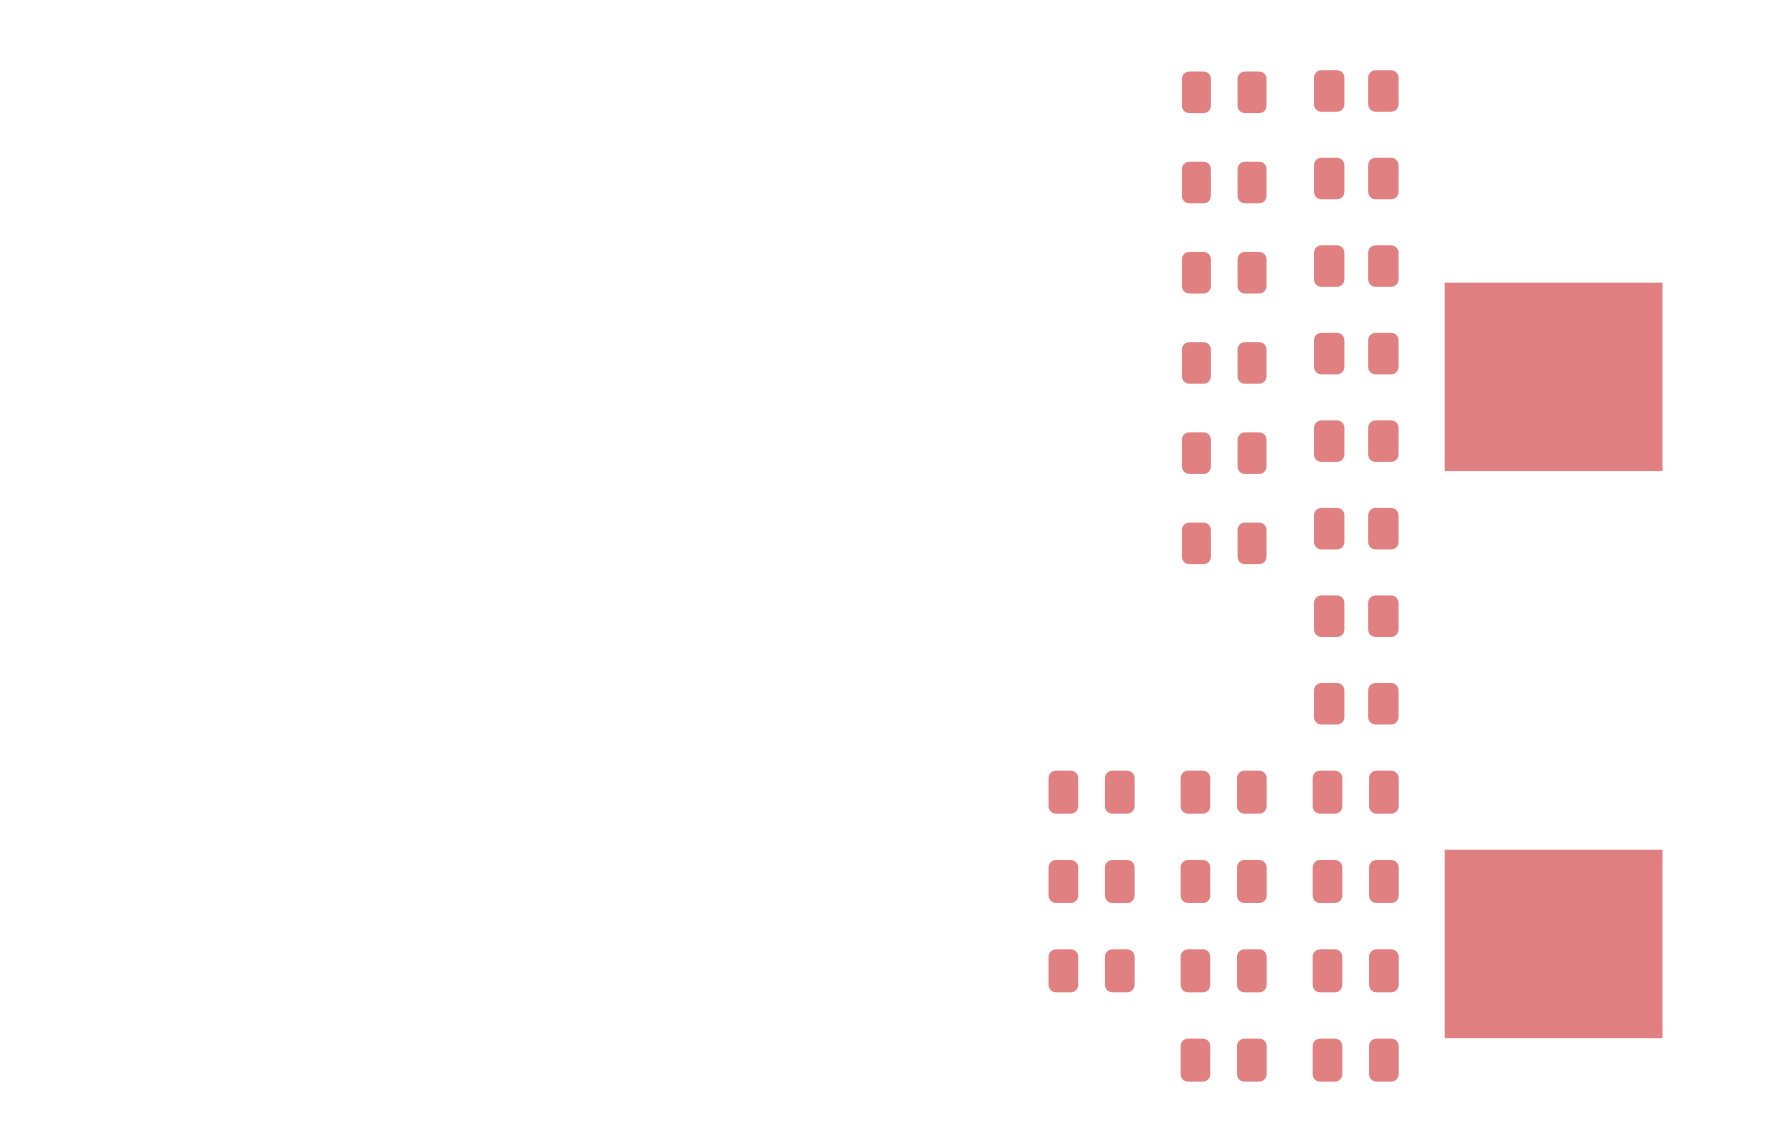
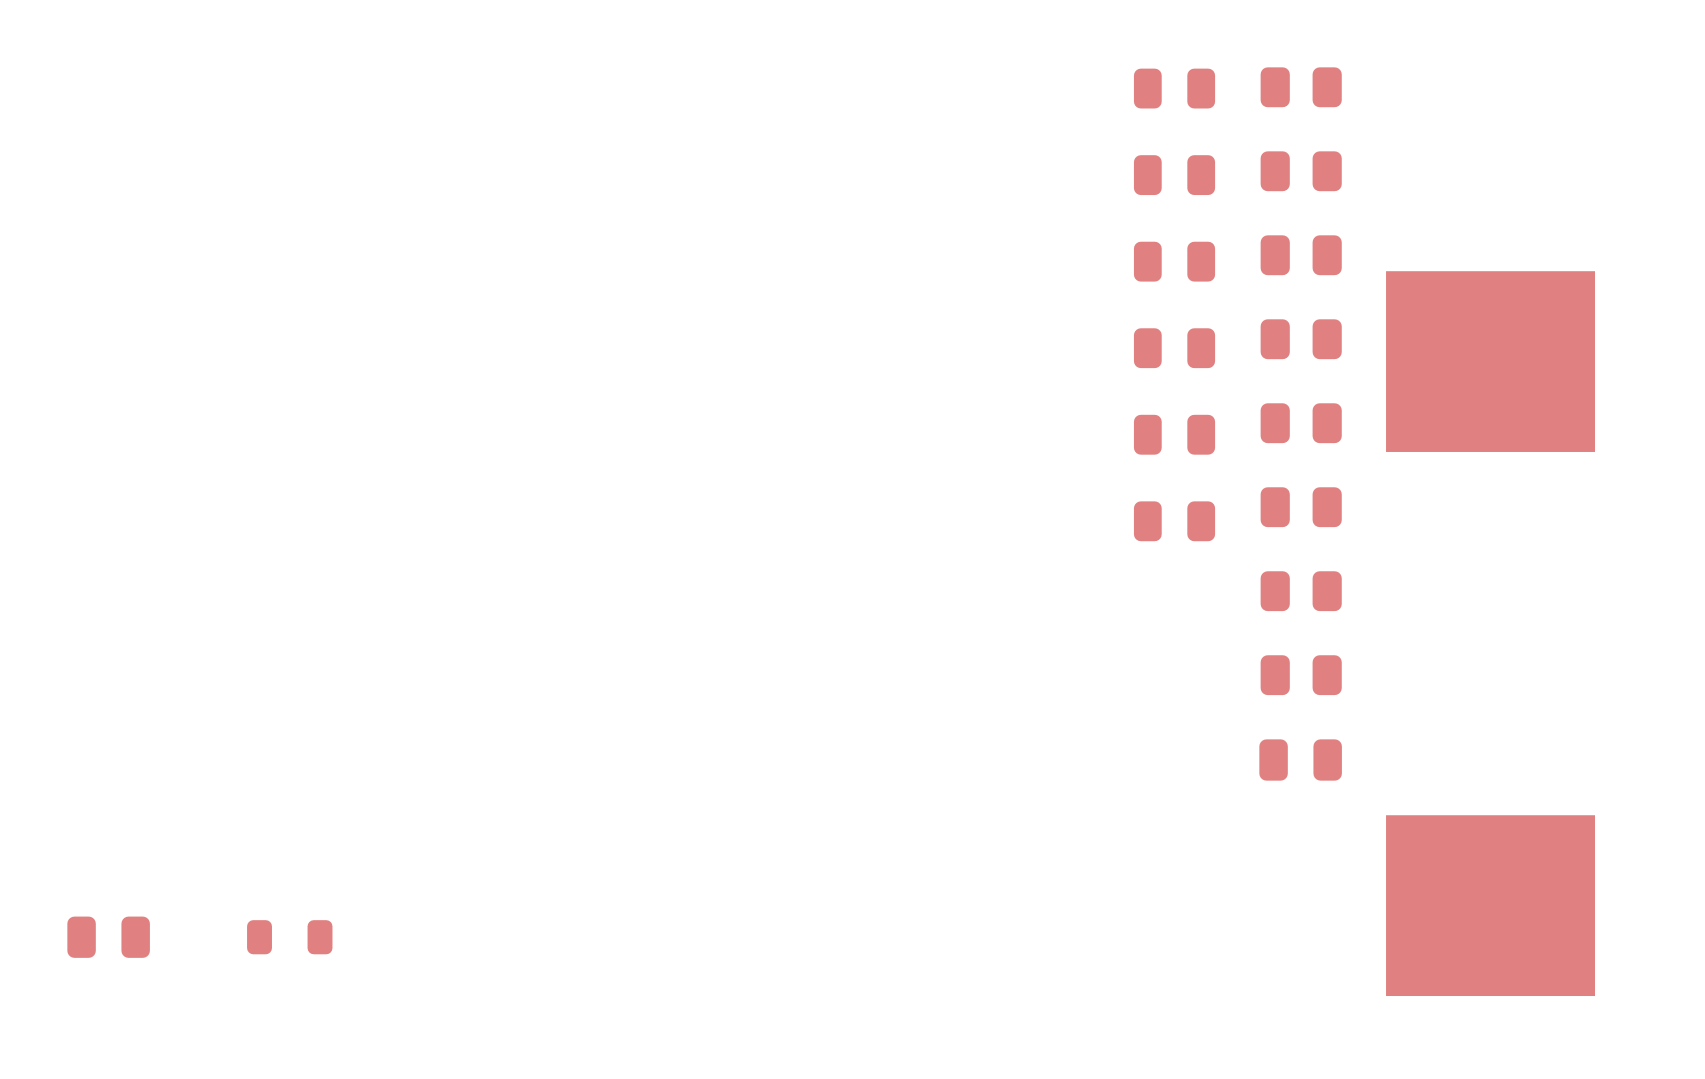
part: (1091, 792) -> none
part: (1223, 792) -> none
part: (1091, 881) -> none
part: (1223, 881) -> none
part: (1355, 881) -> none
part: (1091, 970) -> none
part: (1223, 970) -> none
part: (1355, 970) -> none
part: none -> (108, 937)
part: none -> (289, 937)
part: (1223, 1060) -> none
part: (1355, 1060) -> none

